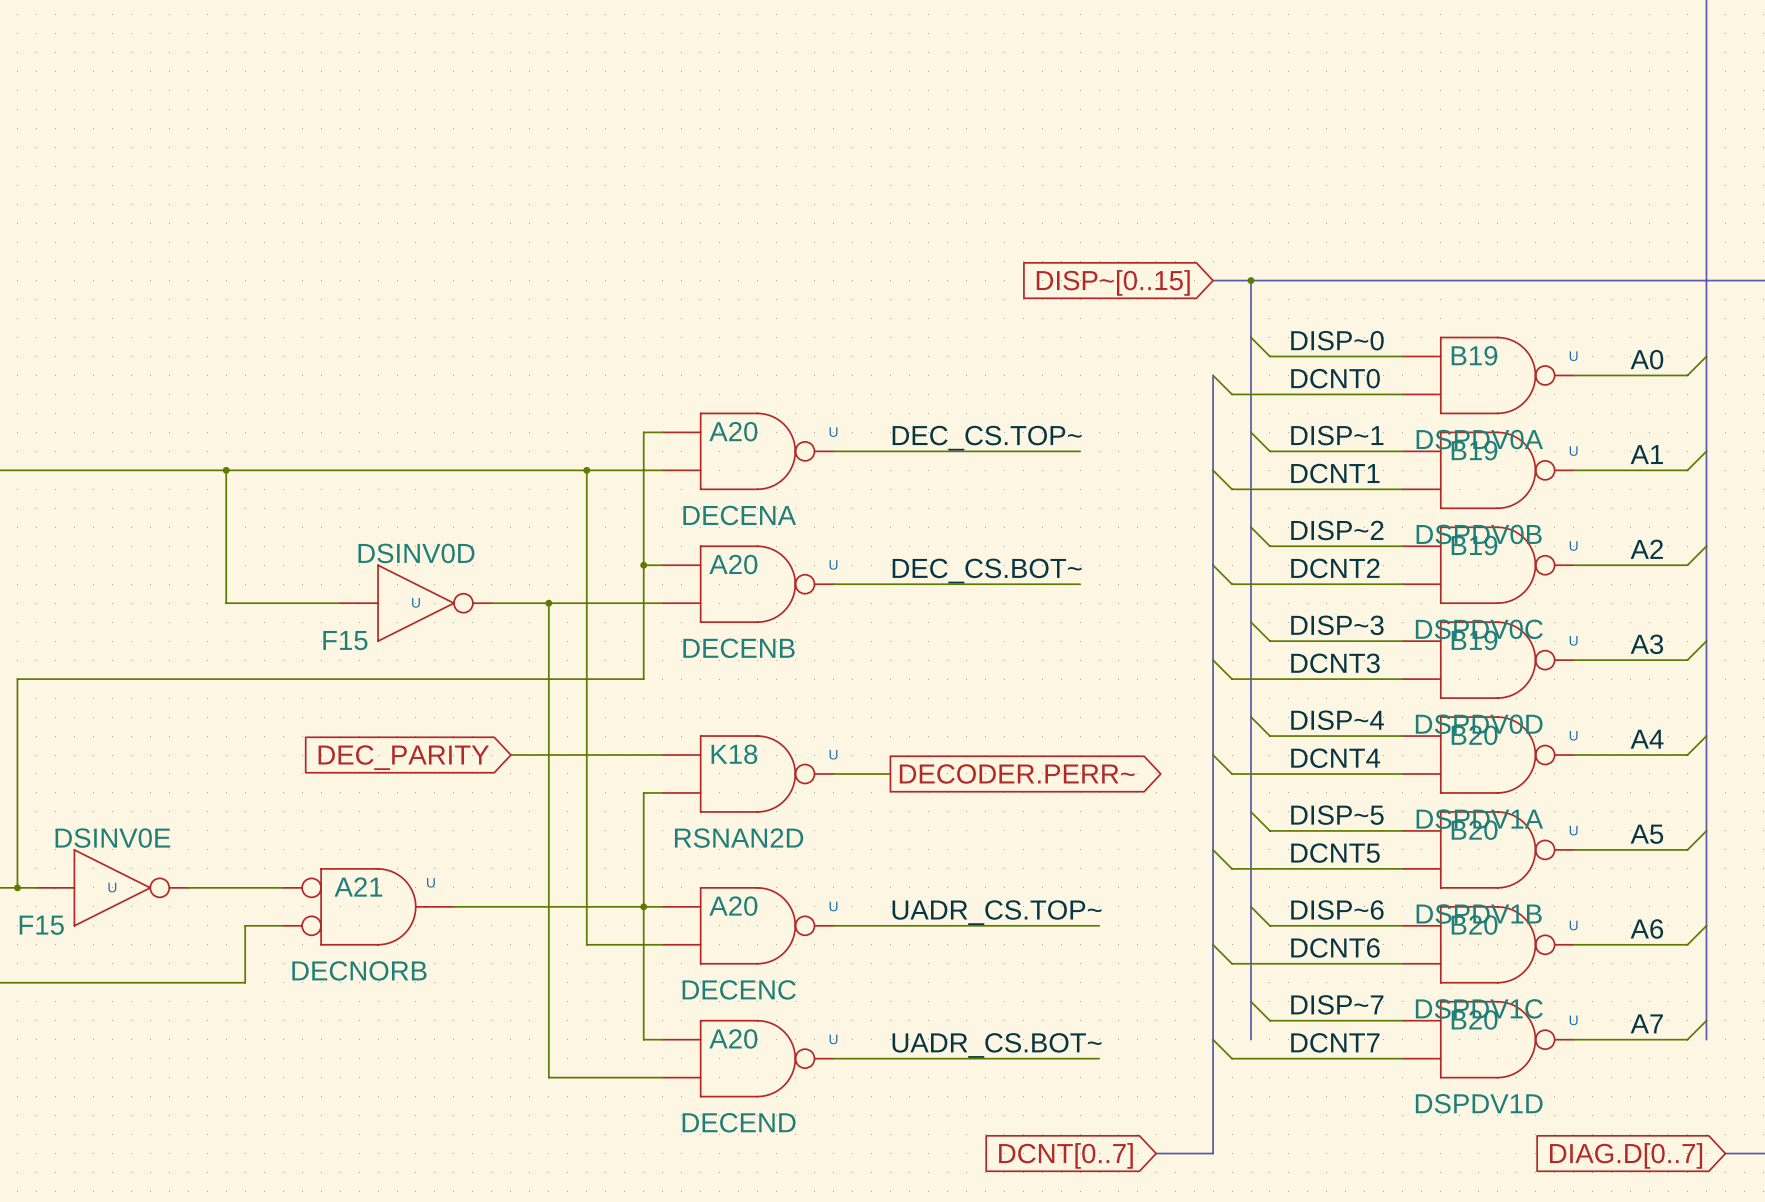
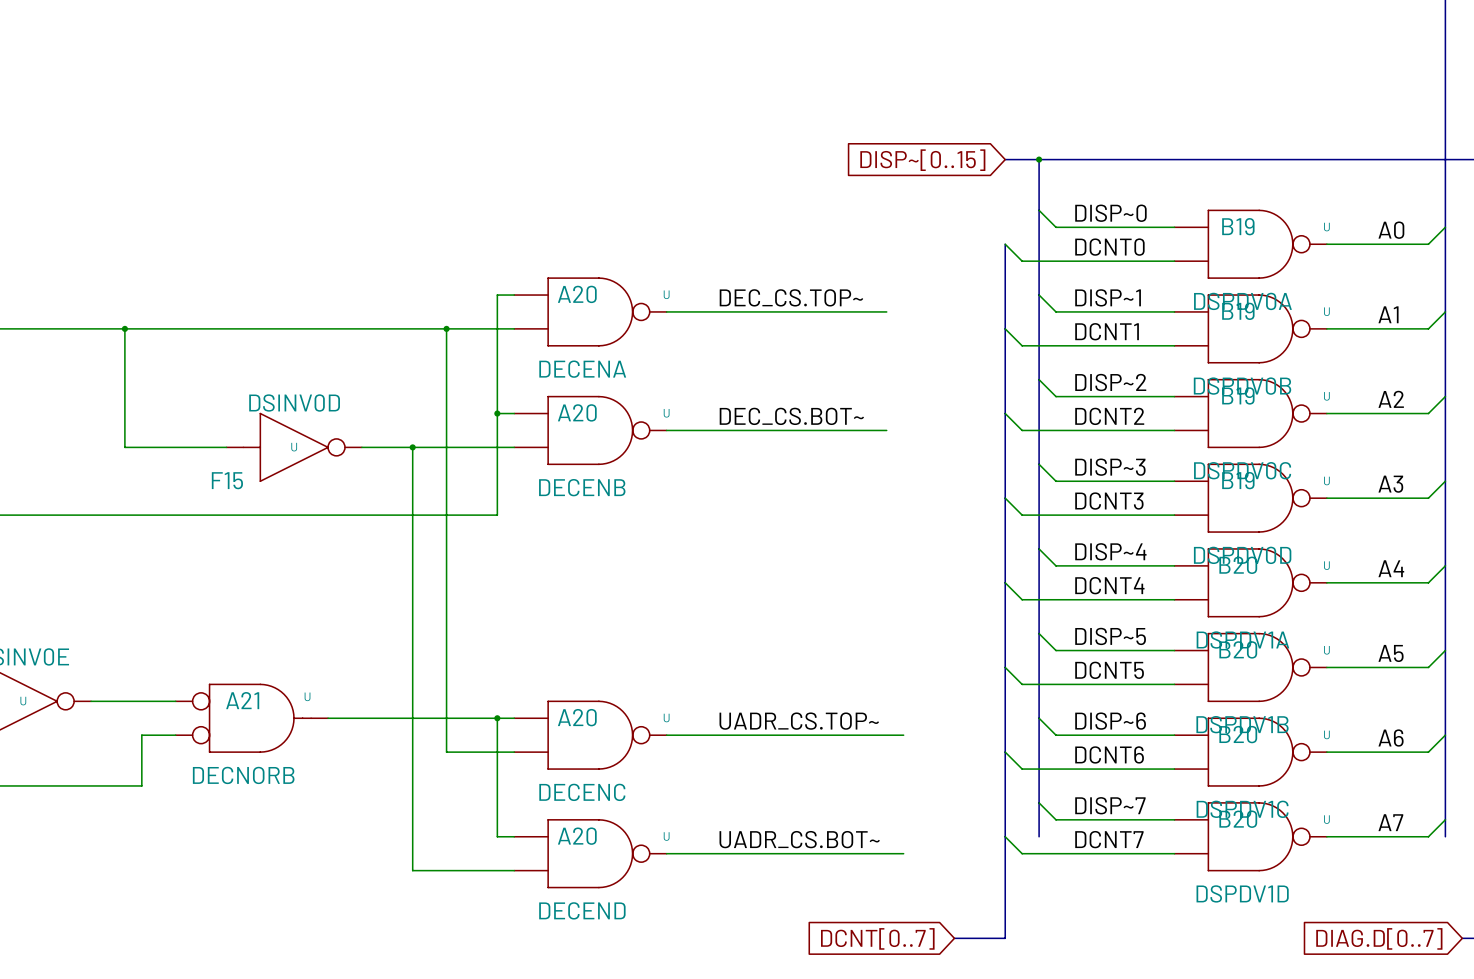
wire: (510, 755) (662, 755) -> none
global label: DEC_PARITY (403, 757) -> none
U: (748, 773) -> none
wire: (833, 773) (890, 773) -> none
global label: DECODER.PERR~ (1017, 773) -> none
wire: (662, 792) (643, 792) (643, 906) -> none

